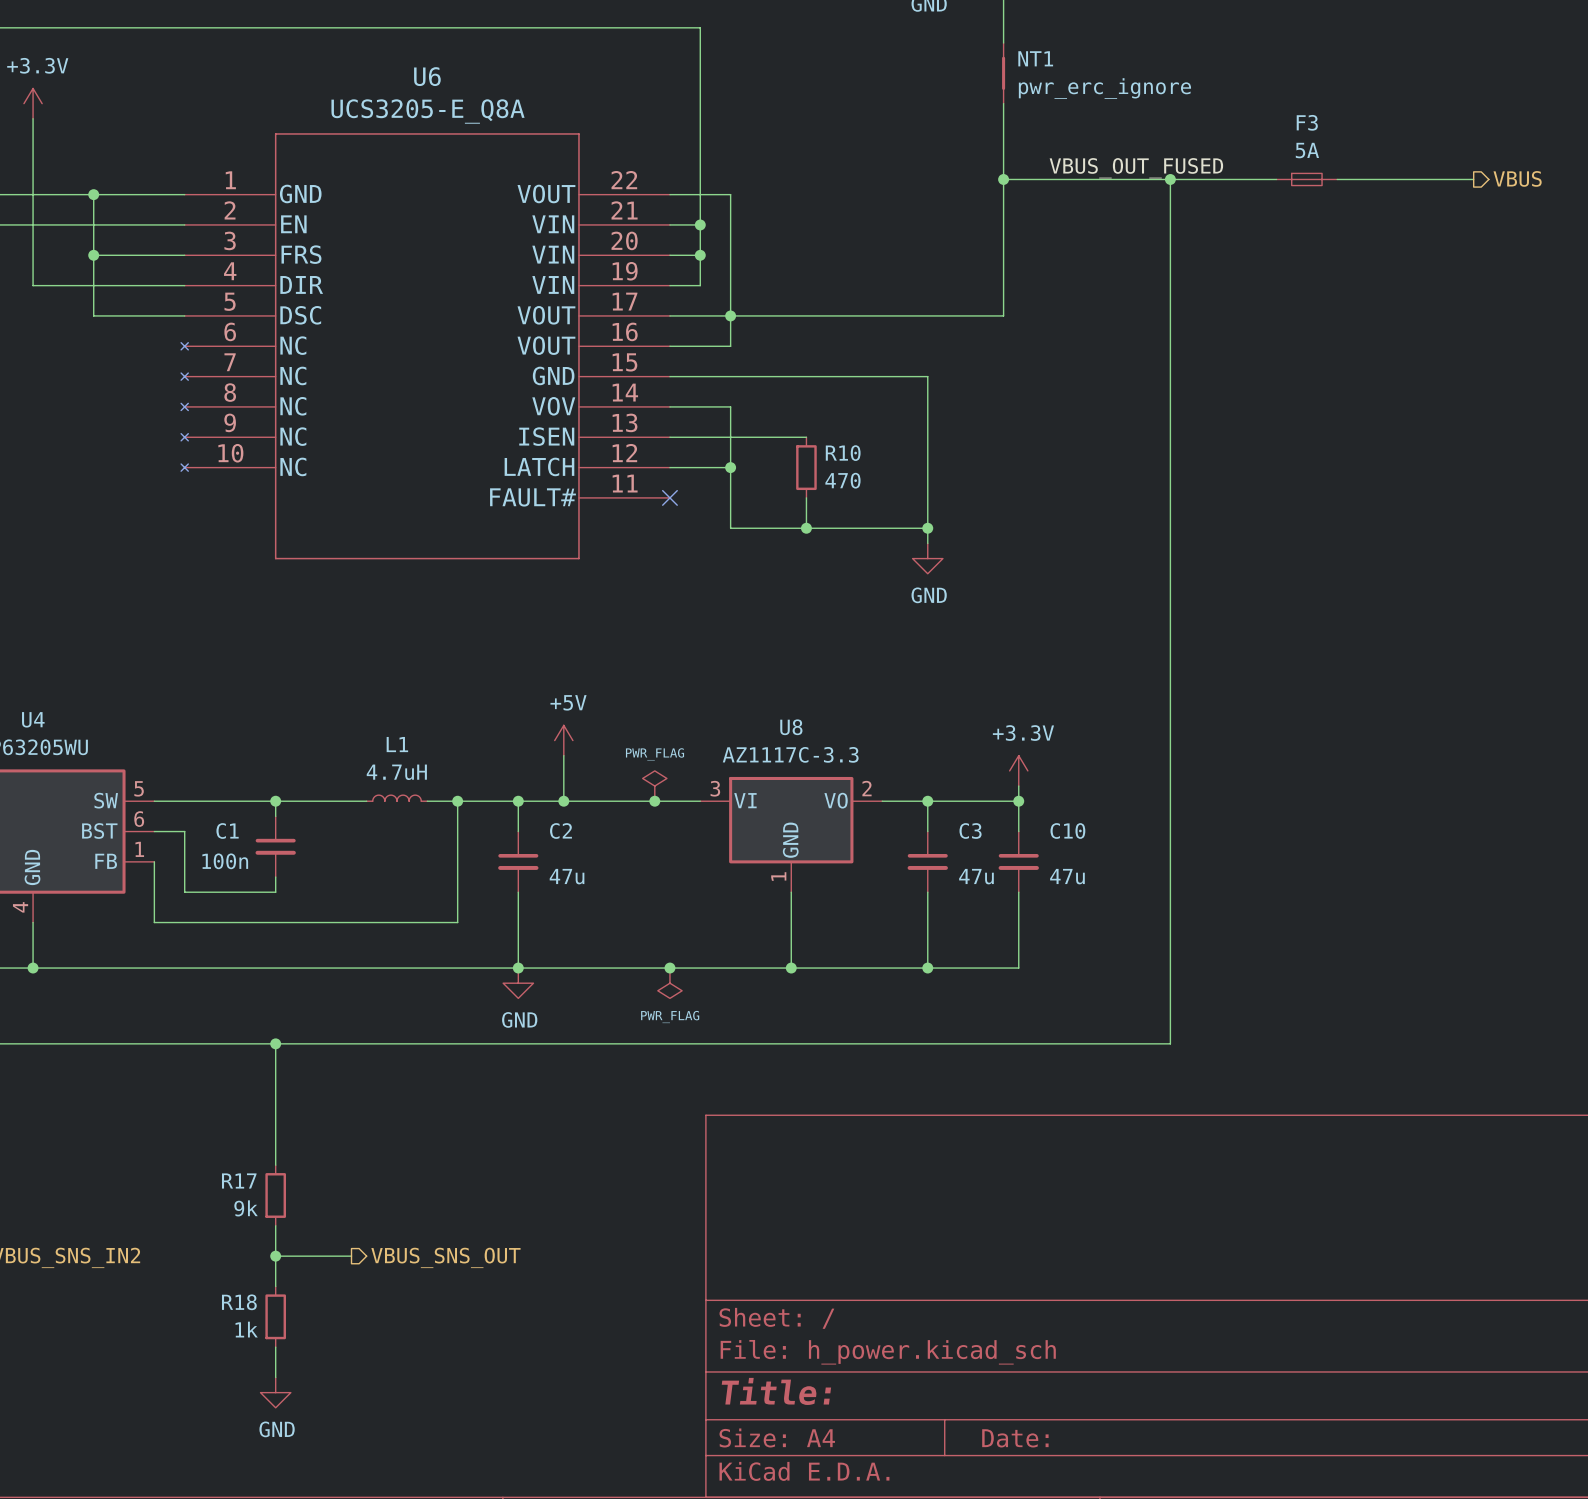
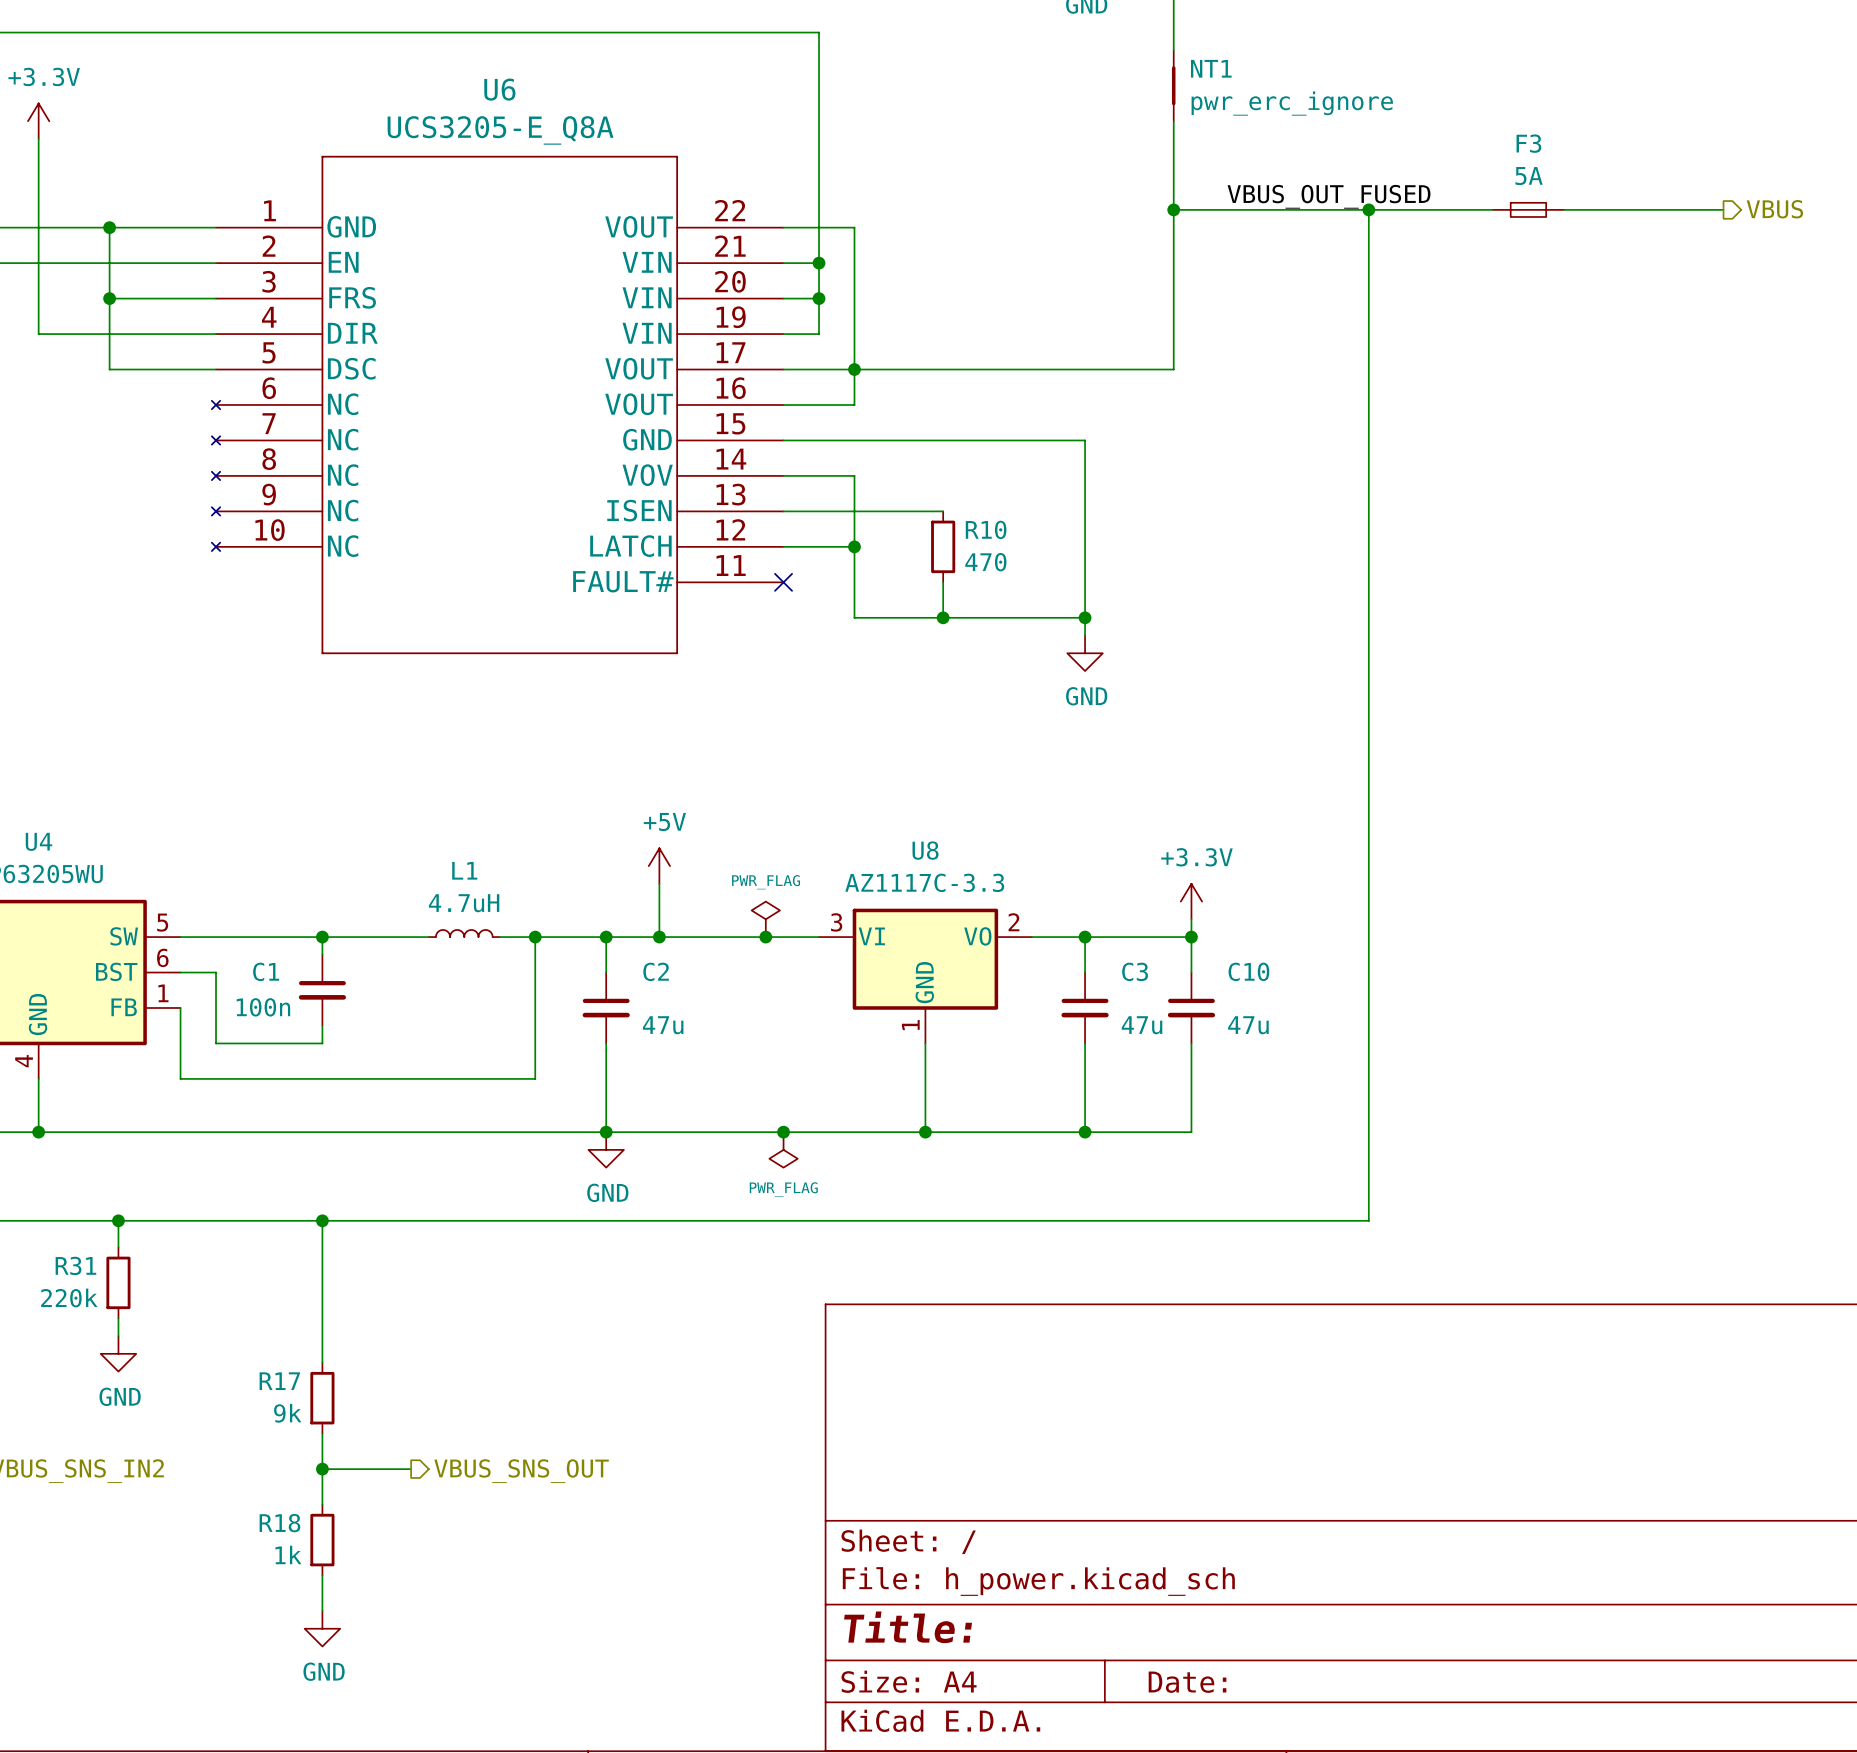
wire: none -> (118, 1220) (118, 1247)
junction: none -> (118, 1220)
R31: none -> 220k (118, 1282)
wire: none -> (118, 1318) (118, 1336)
power symbol: none -> GND (118, 1353)

